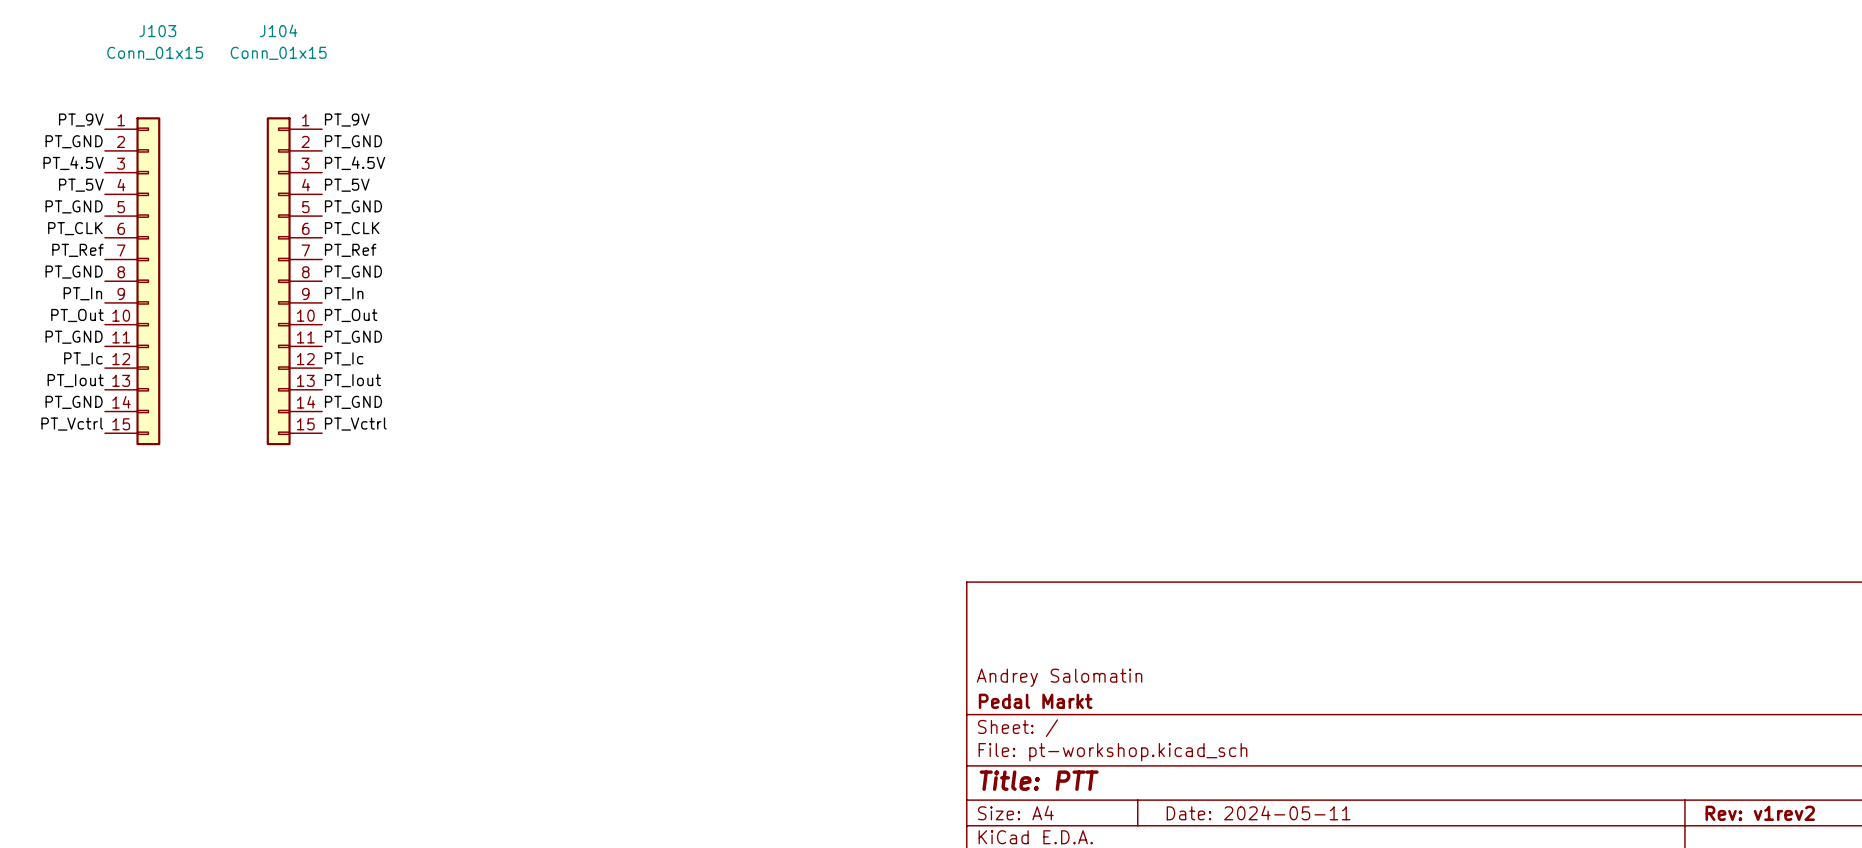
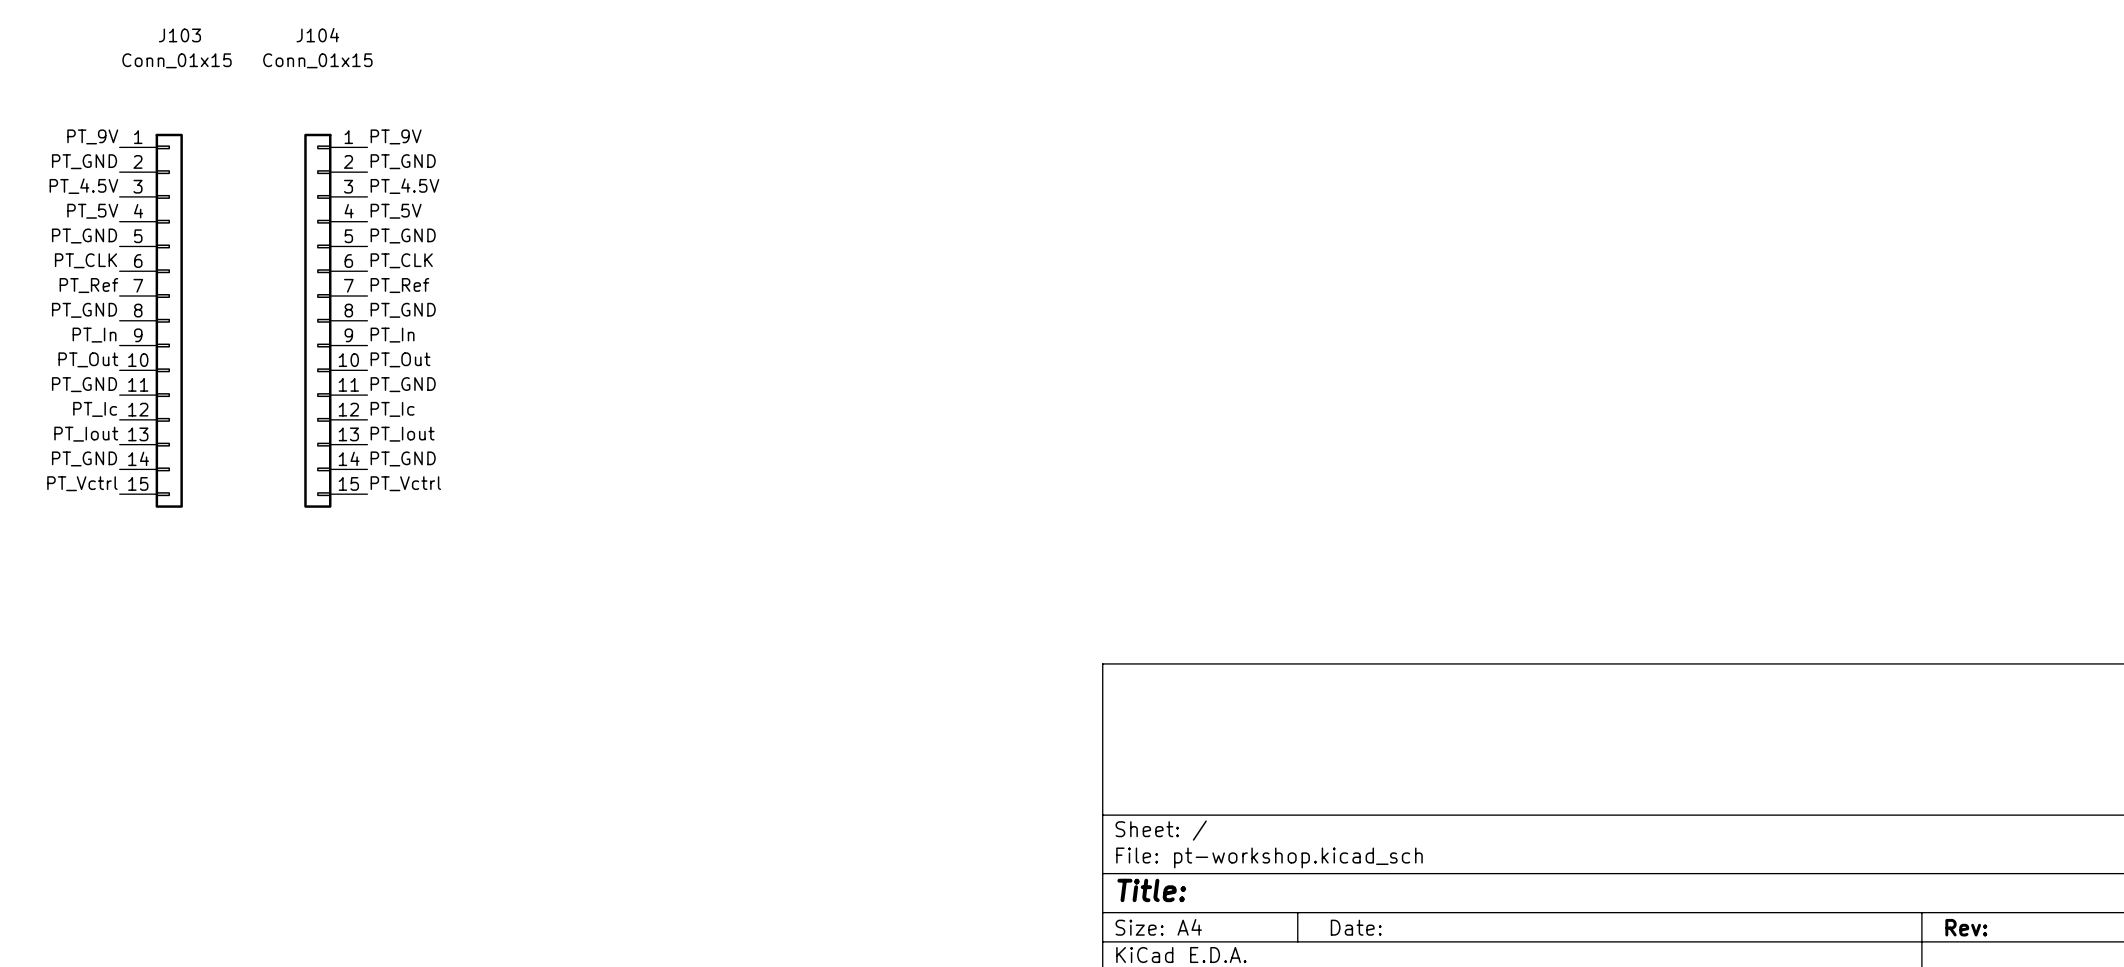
title block: Andrey Salomatin (1059, 677) -> none
title block: Pedal Markt (1035, 701) -> none
title block: Title: PTT (1039, 780) -> Title: (1151, 890)
title block: Date: 2024-05-11 (1258, 813) -> Date: (1356, 927)
title block: Rev: v1rev2 (1760, 813) -> Rev: (1966, 927)

